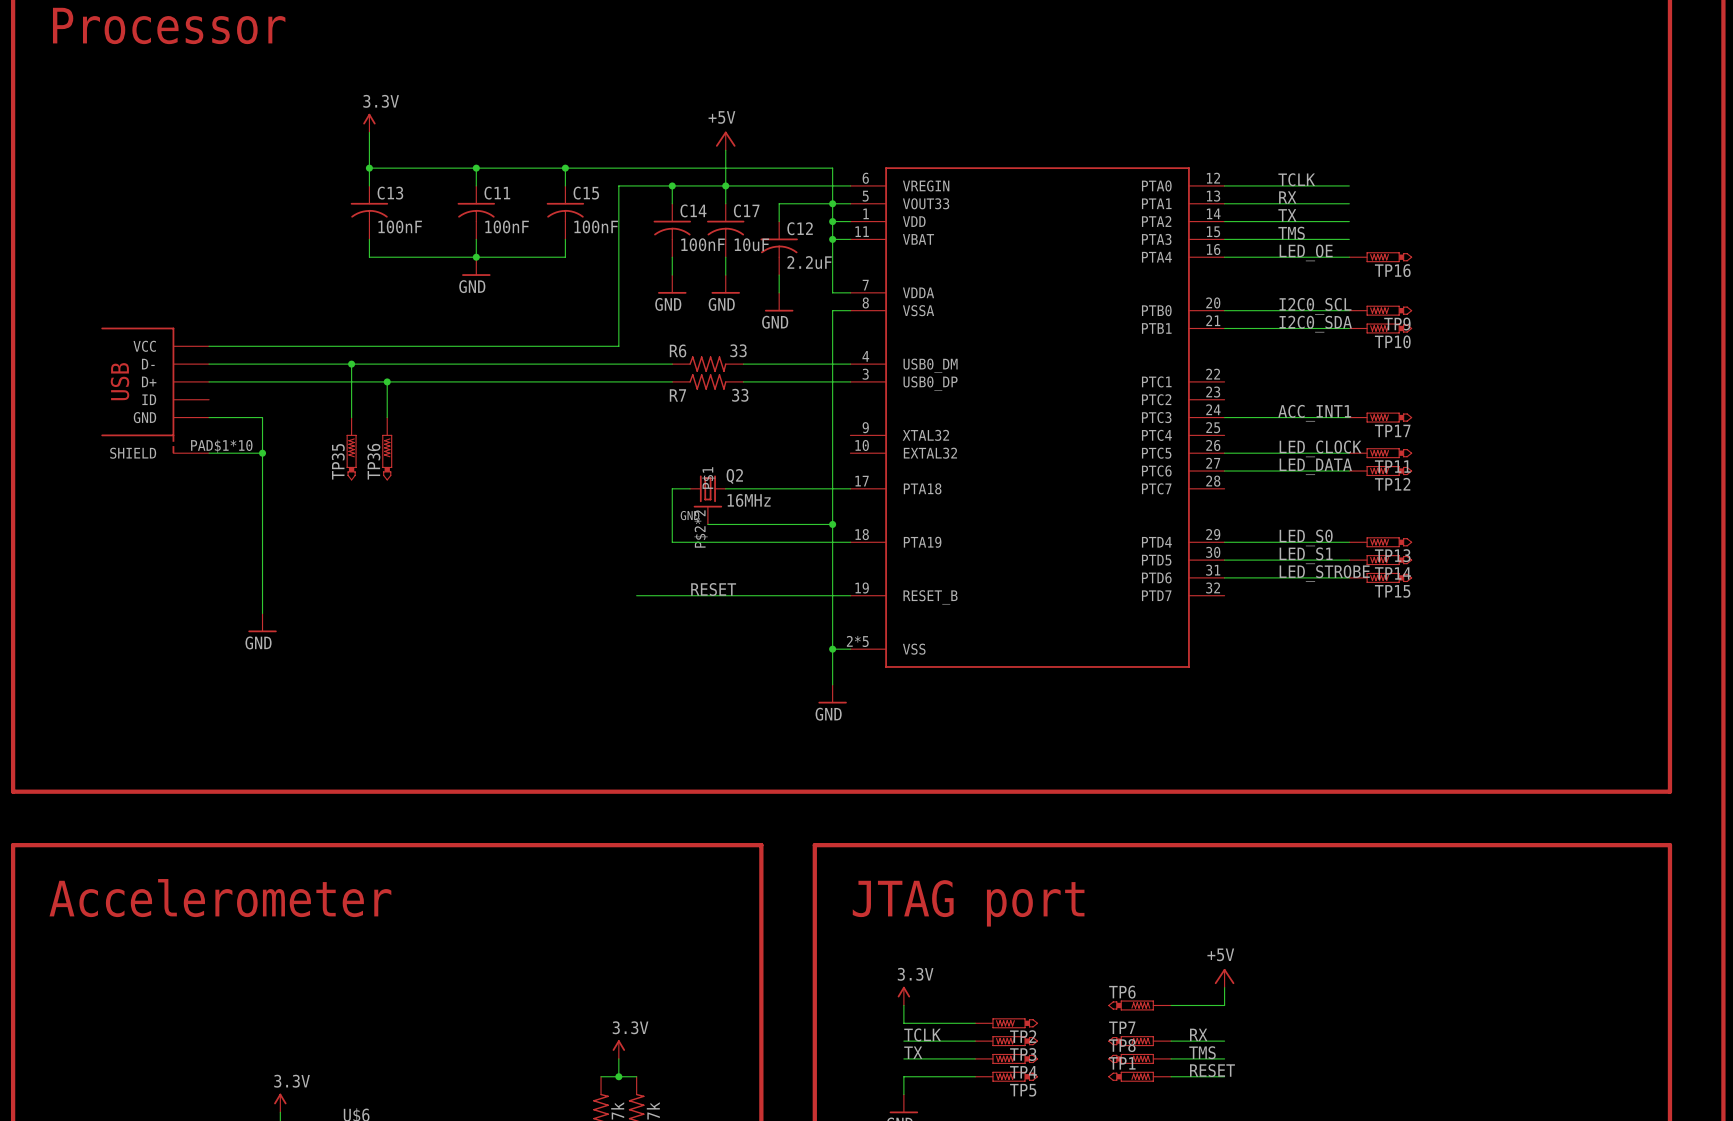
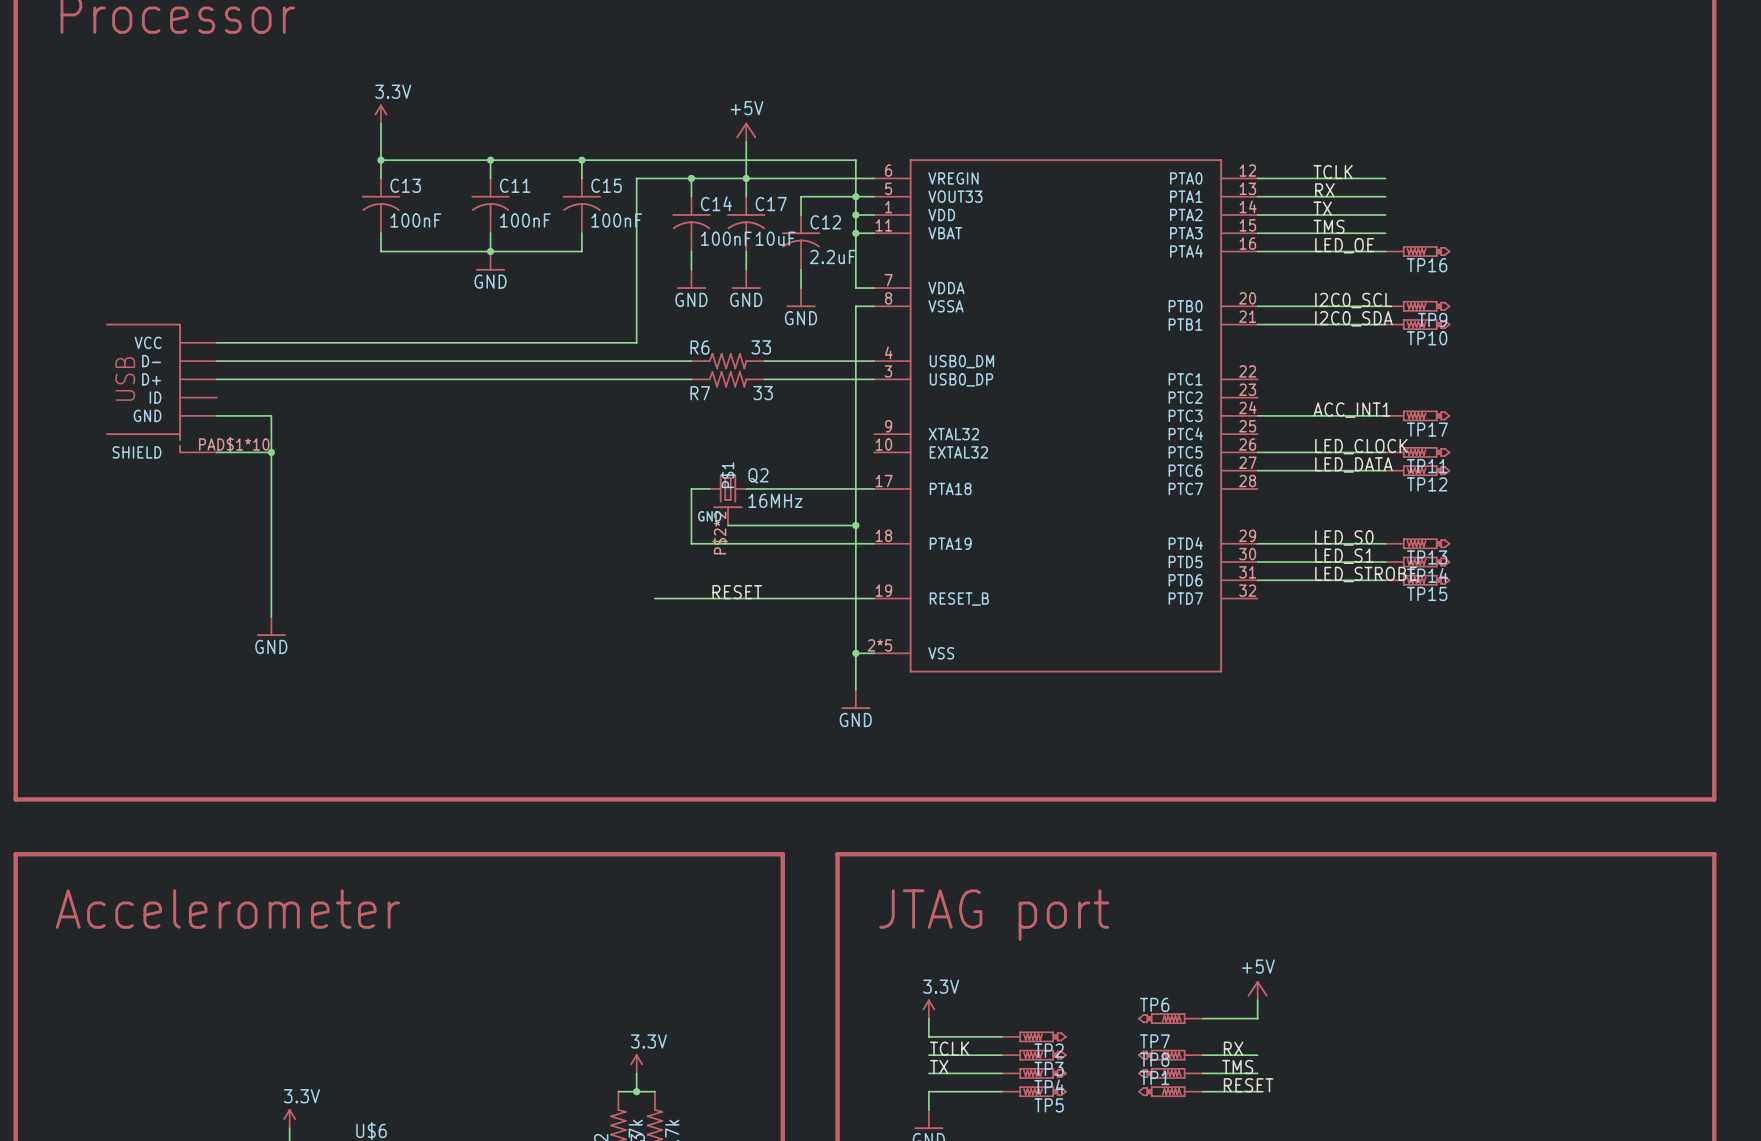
wire: (351, 364) (351, 417) -> none
junction: (351, 364) -> none
wire: (387, 381) (387, 417) -> none
junction: (387, 381) -> none
TP35: (351, 449) -> none
TP36: (387, 449) -> none

